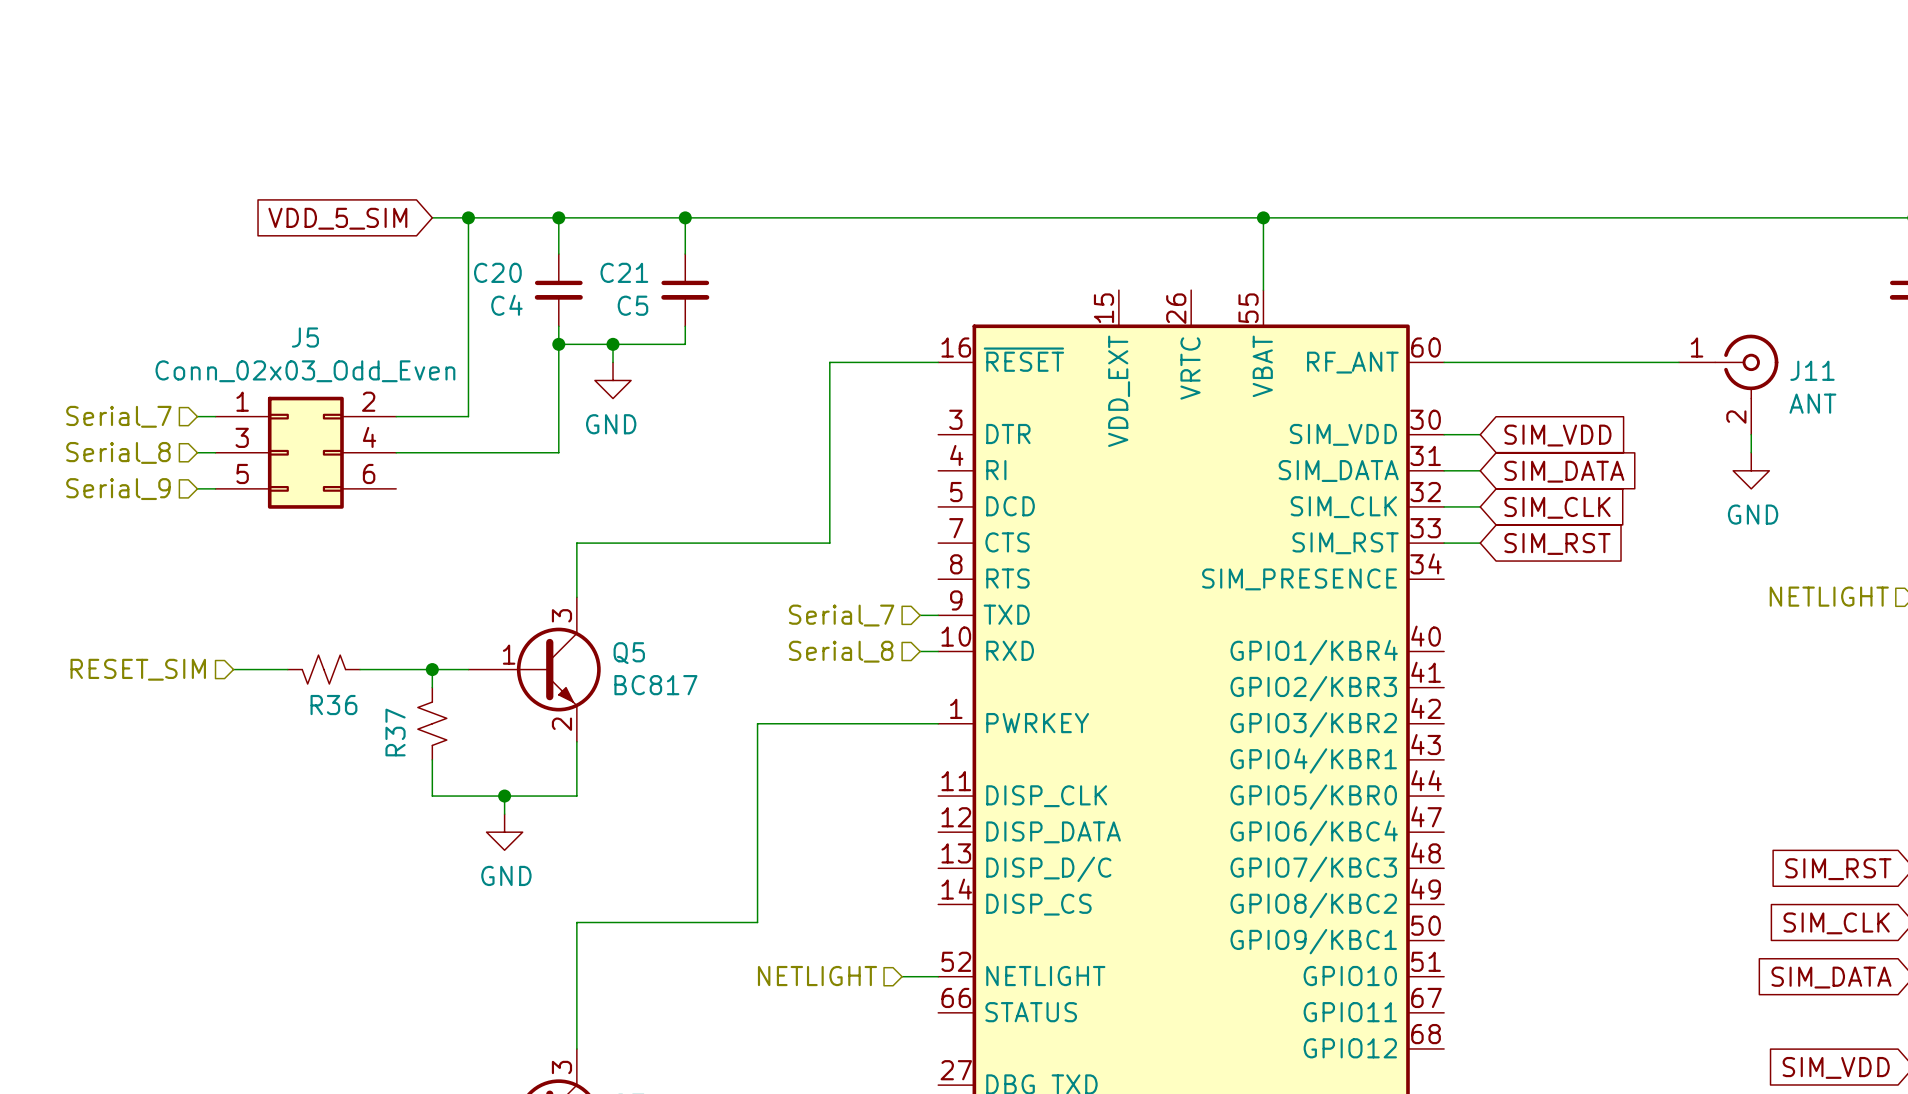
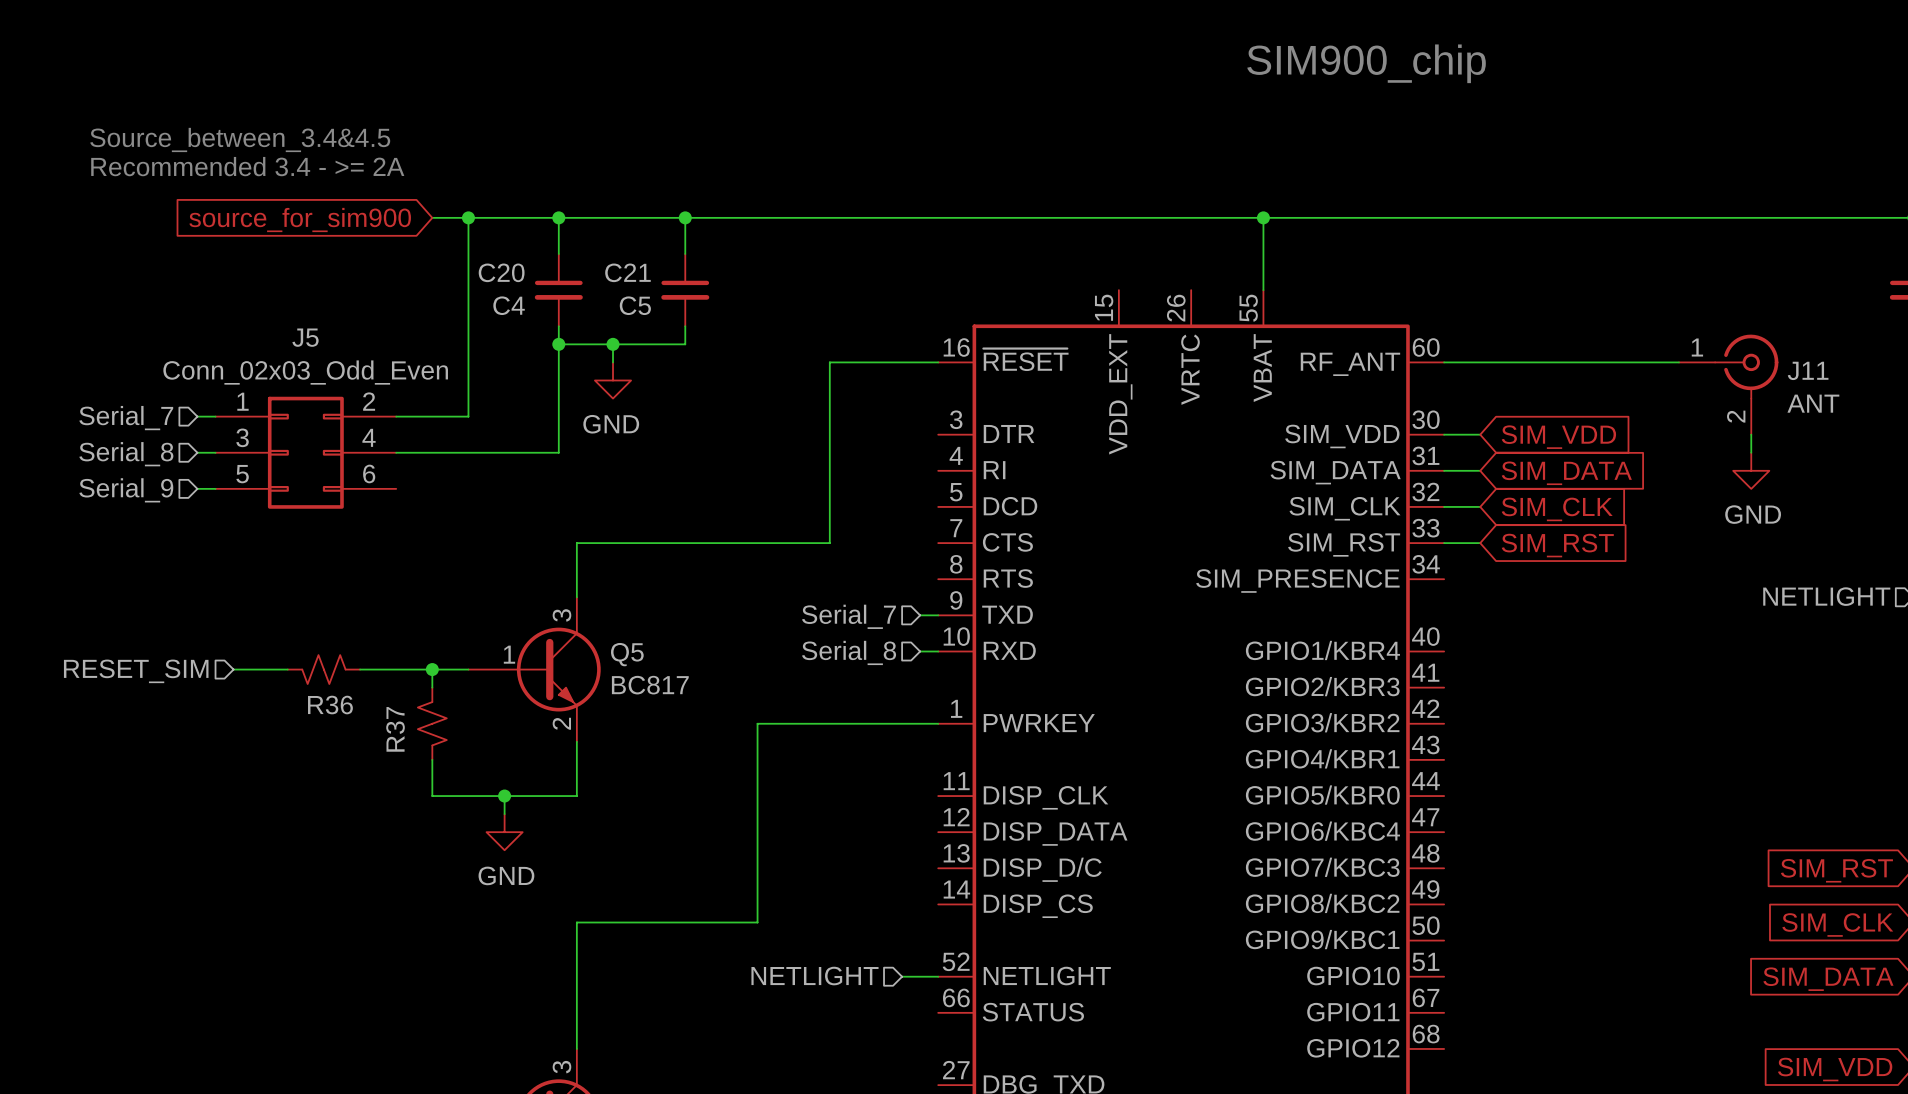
text: none -> SIM900_chip (1366, 63)
text: none -> Source_between_3.4&4.5 (240, 139)
text: none -> Recommended 3.4 - >= 2A (247, 166)
global label: VDD_5_SIM (337, 218) -> source_for_sim900 (300, 220)

